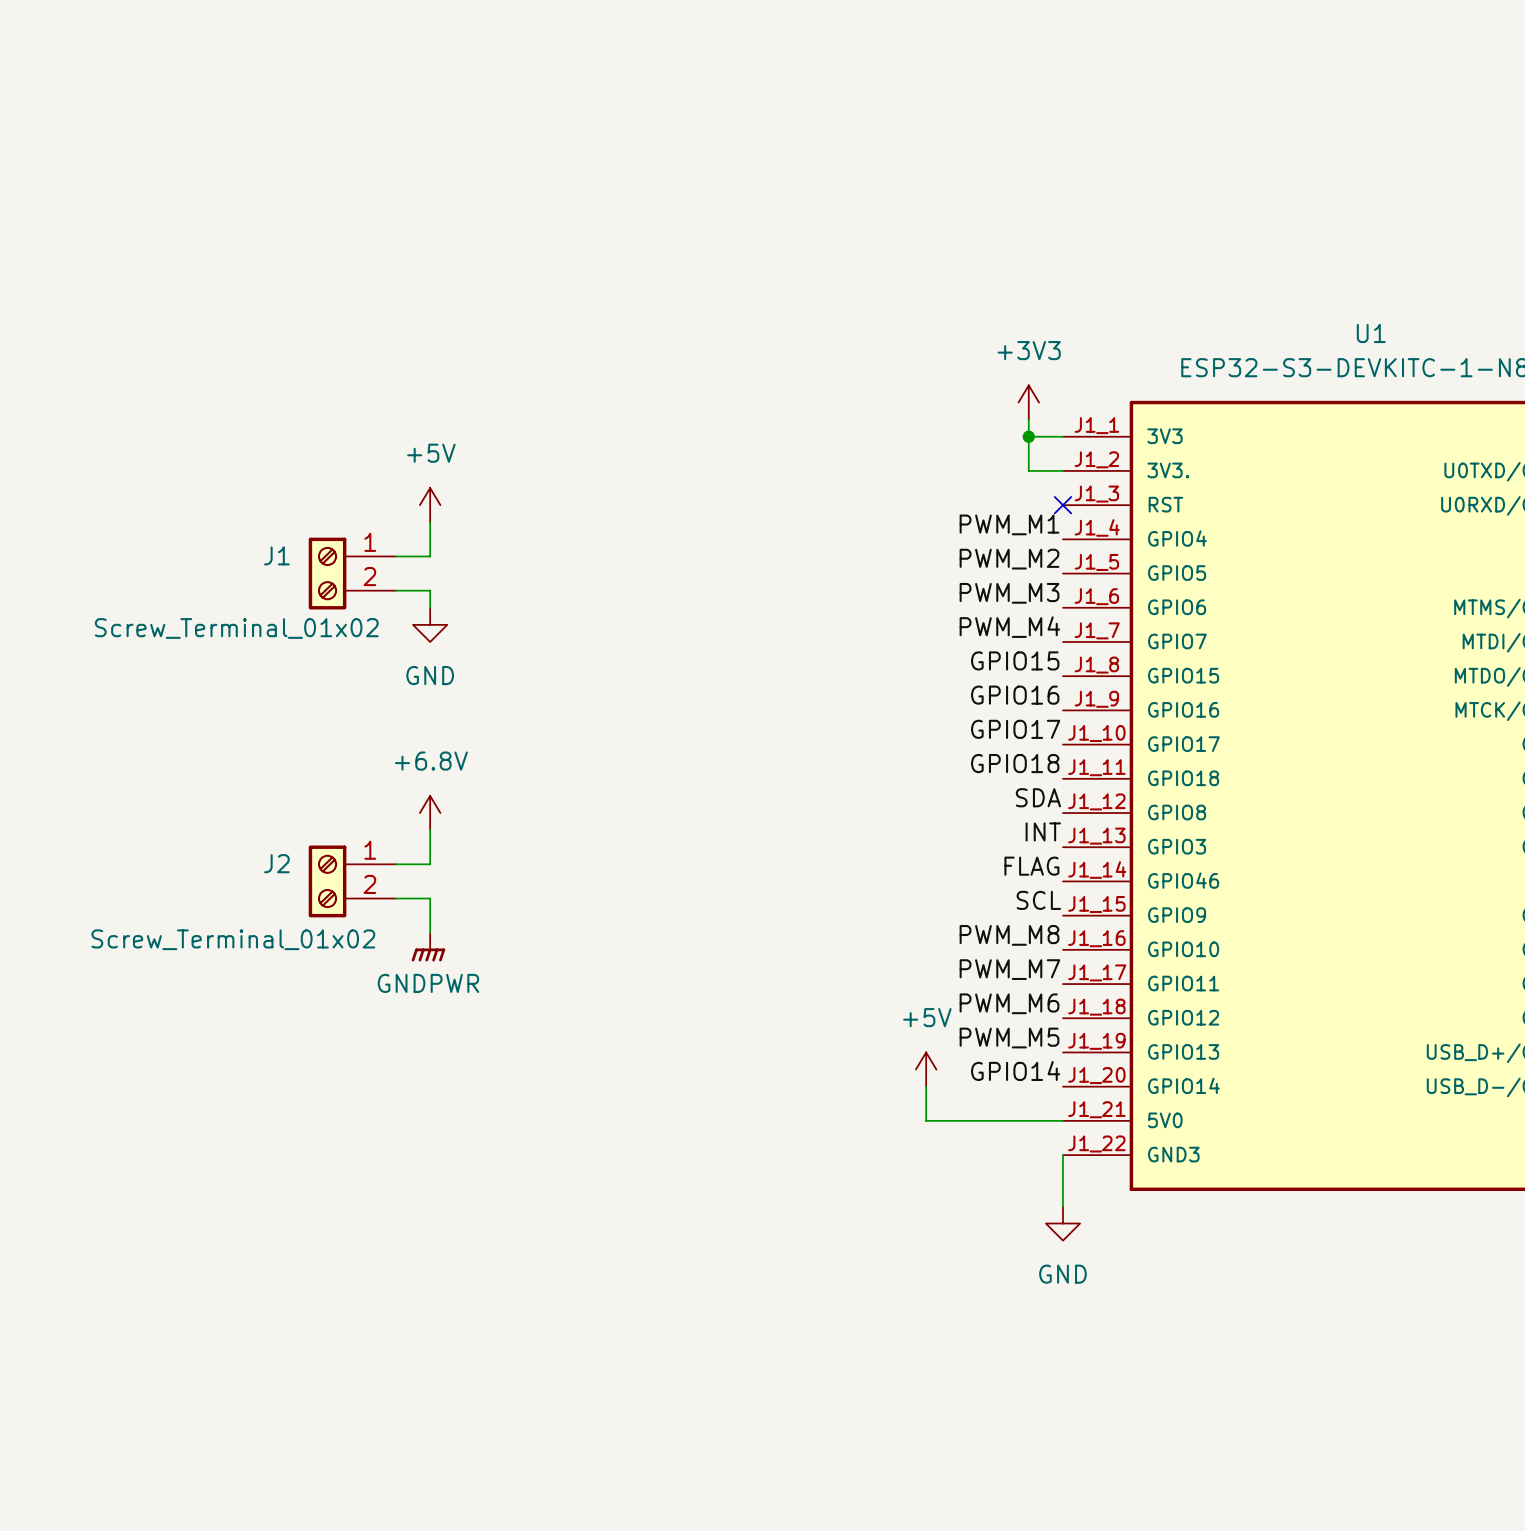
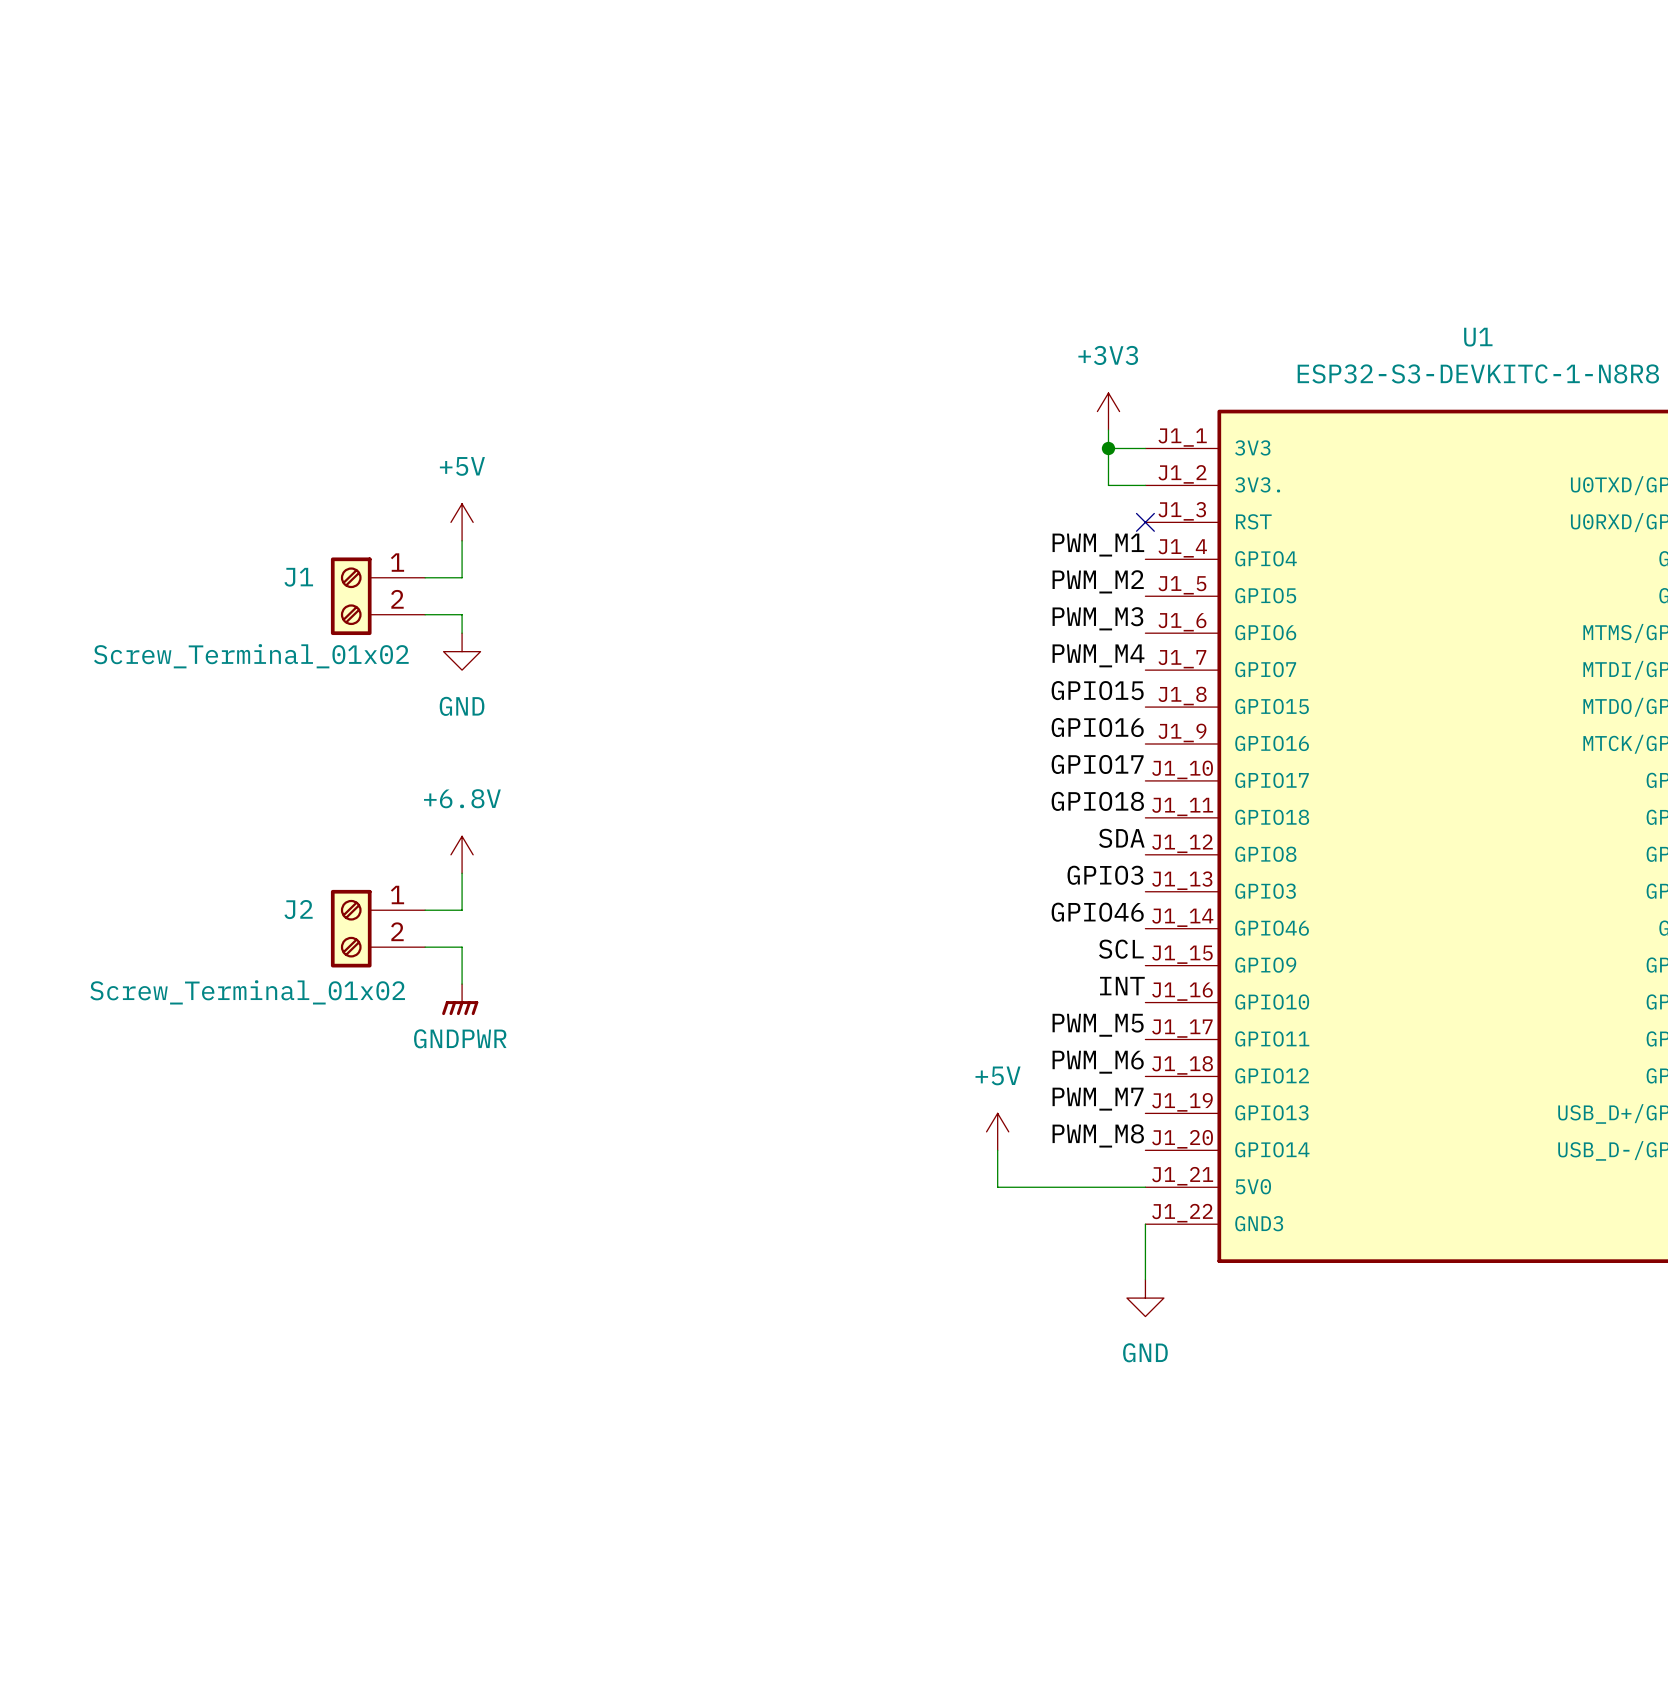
label: INT (1043, 831) -> GPIO3 (1105, 875)
label: FLAG (1031, 866) -> GPIO46 (1097, 912)
label: PWM_M8 (1009, 935) -> INT (1122, 986)
label: PWM_M7 (1009, 969) -> PWM_M5 (1098, 1025)
label: PWM_M5 (1009, 1038) -> PWM_M7 (1098, 1099)
label: GPIO14 (1015, 1071) -> PWM_M8 (1098, 1135)

